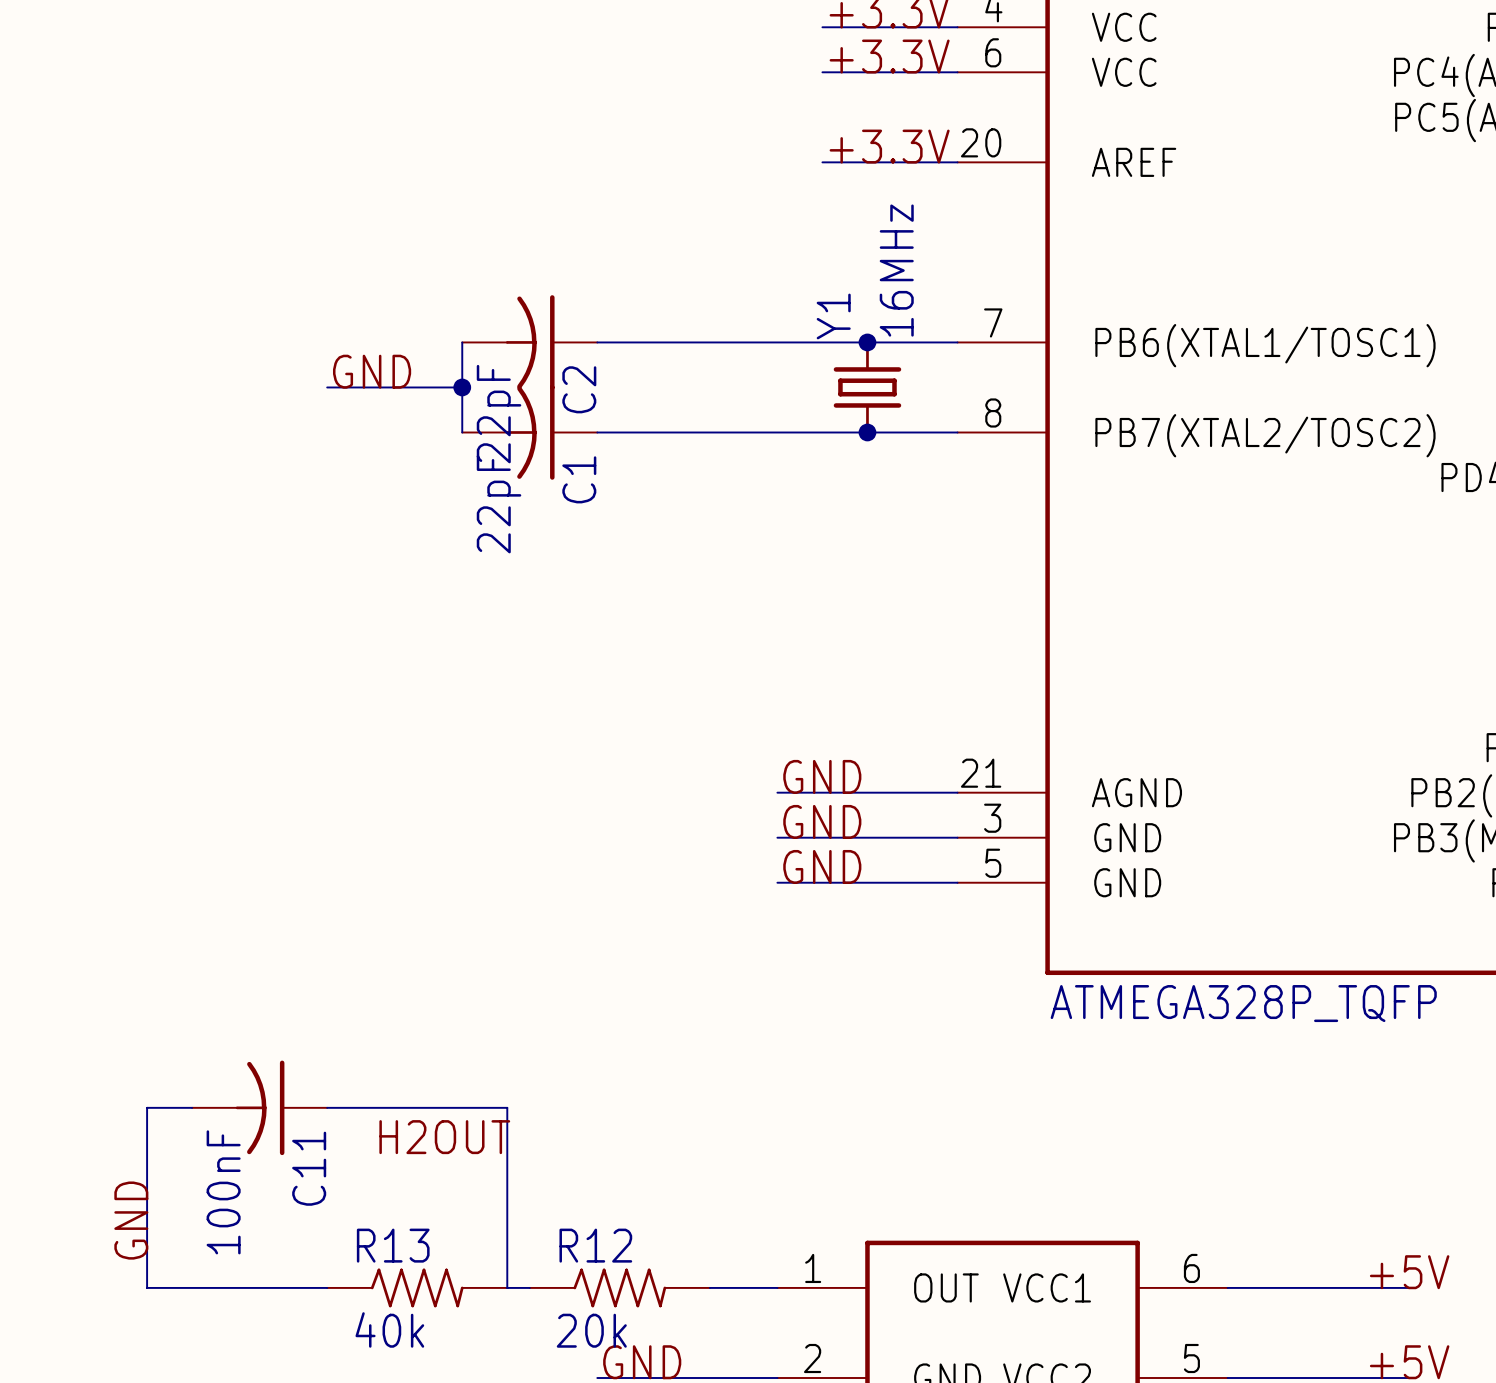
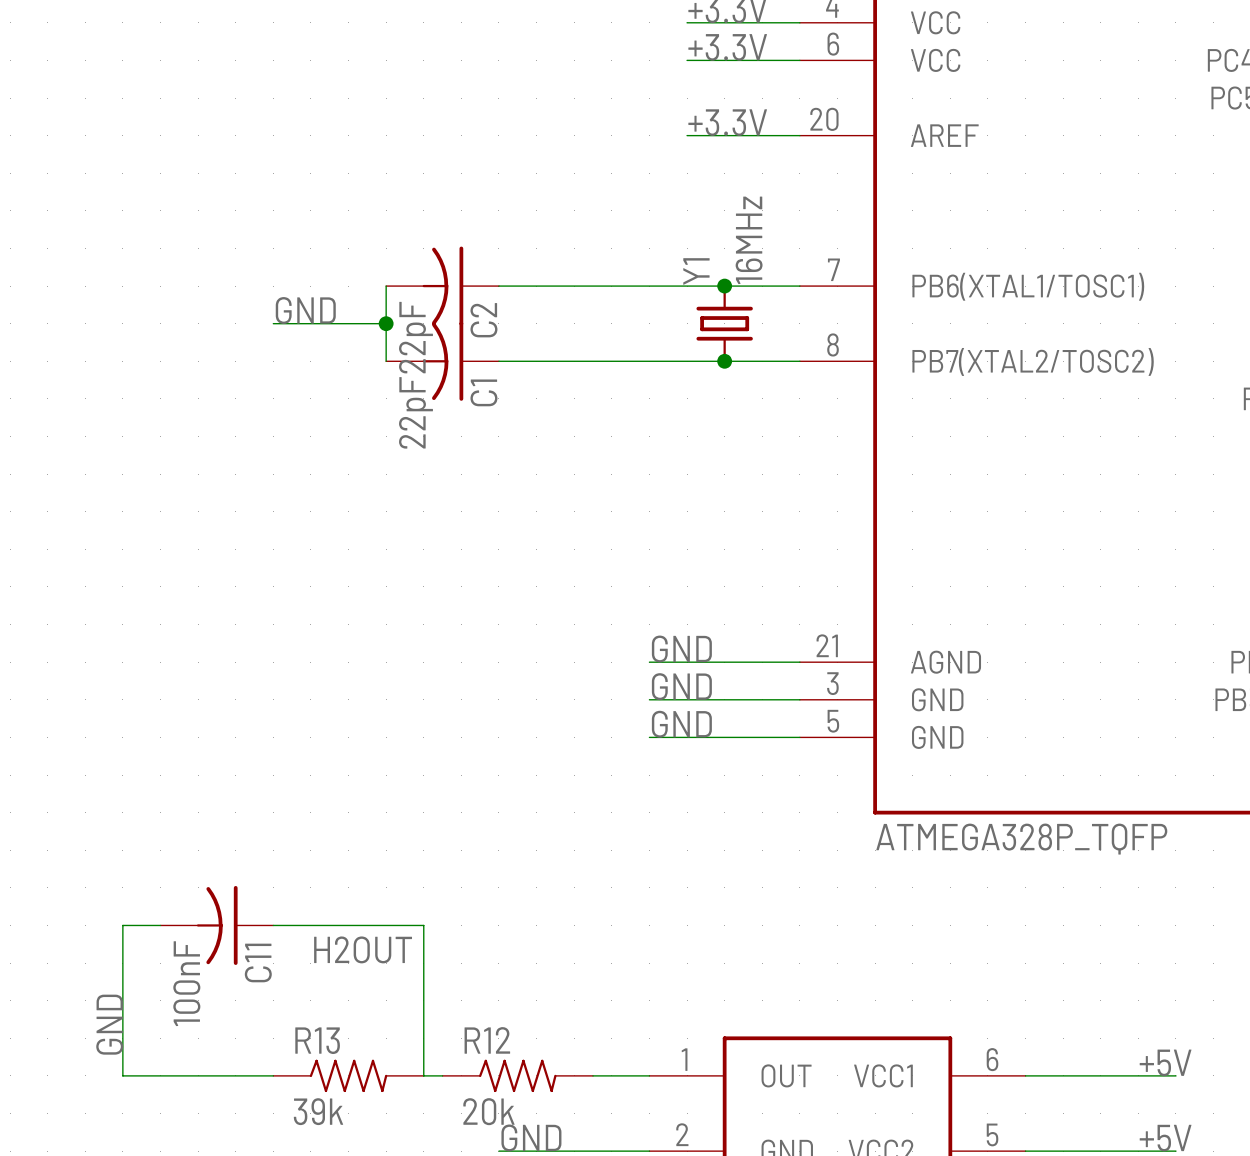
R13 value: 40k (389, 1329) -> 39k (318, 1111)

